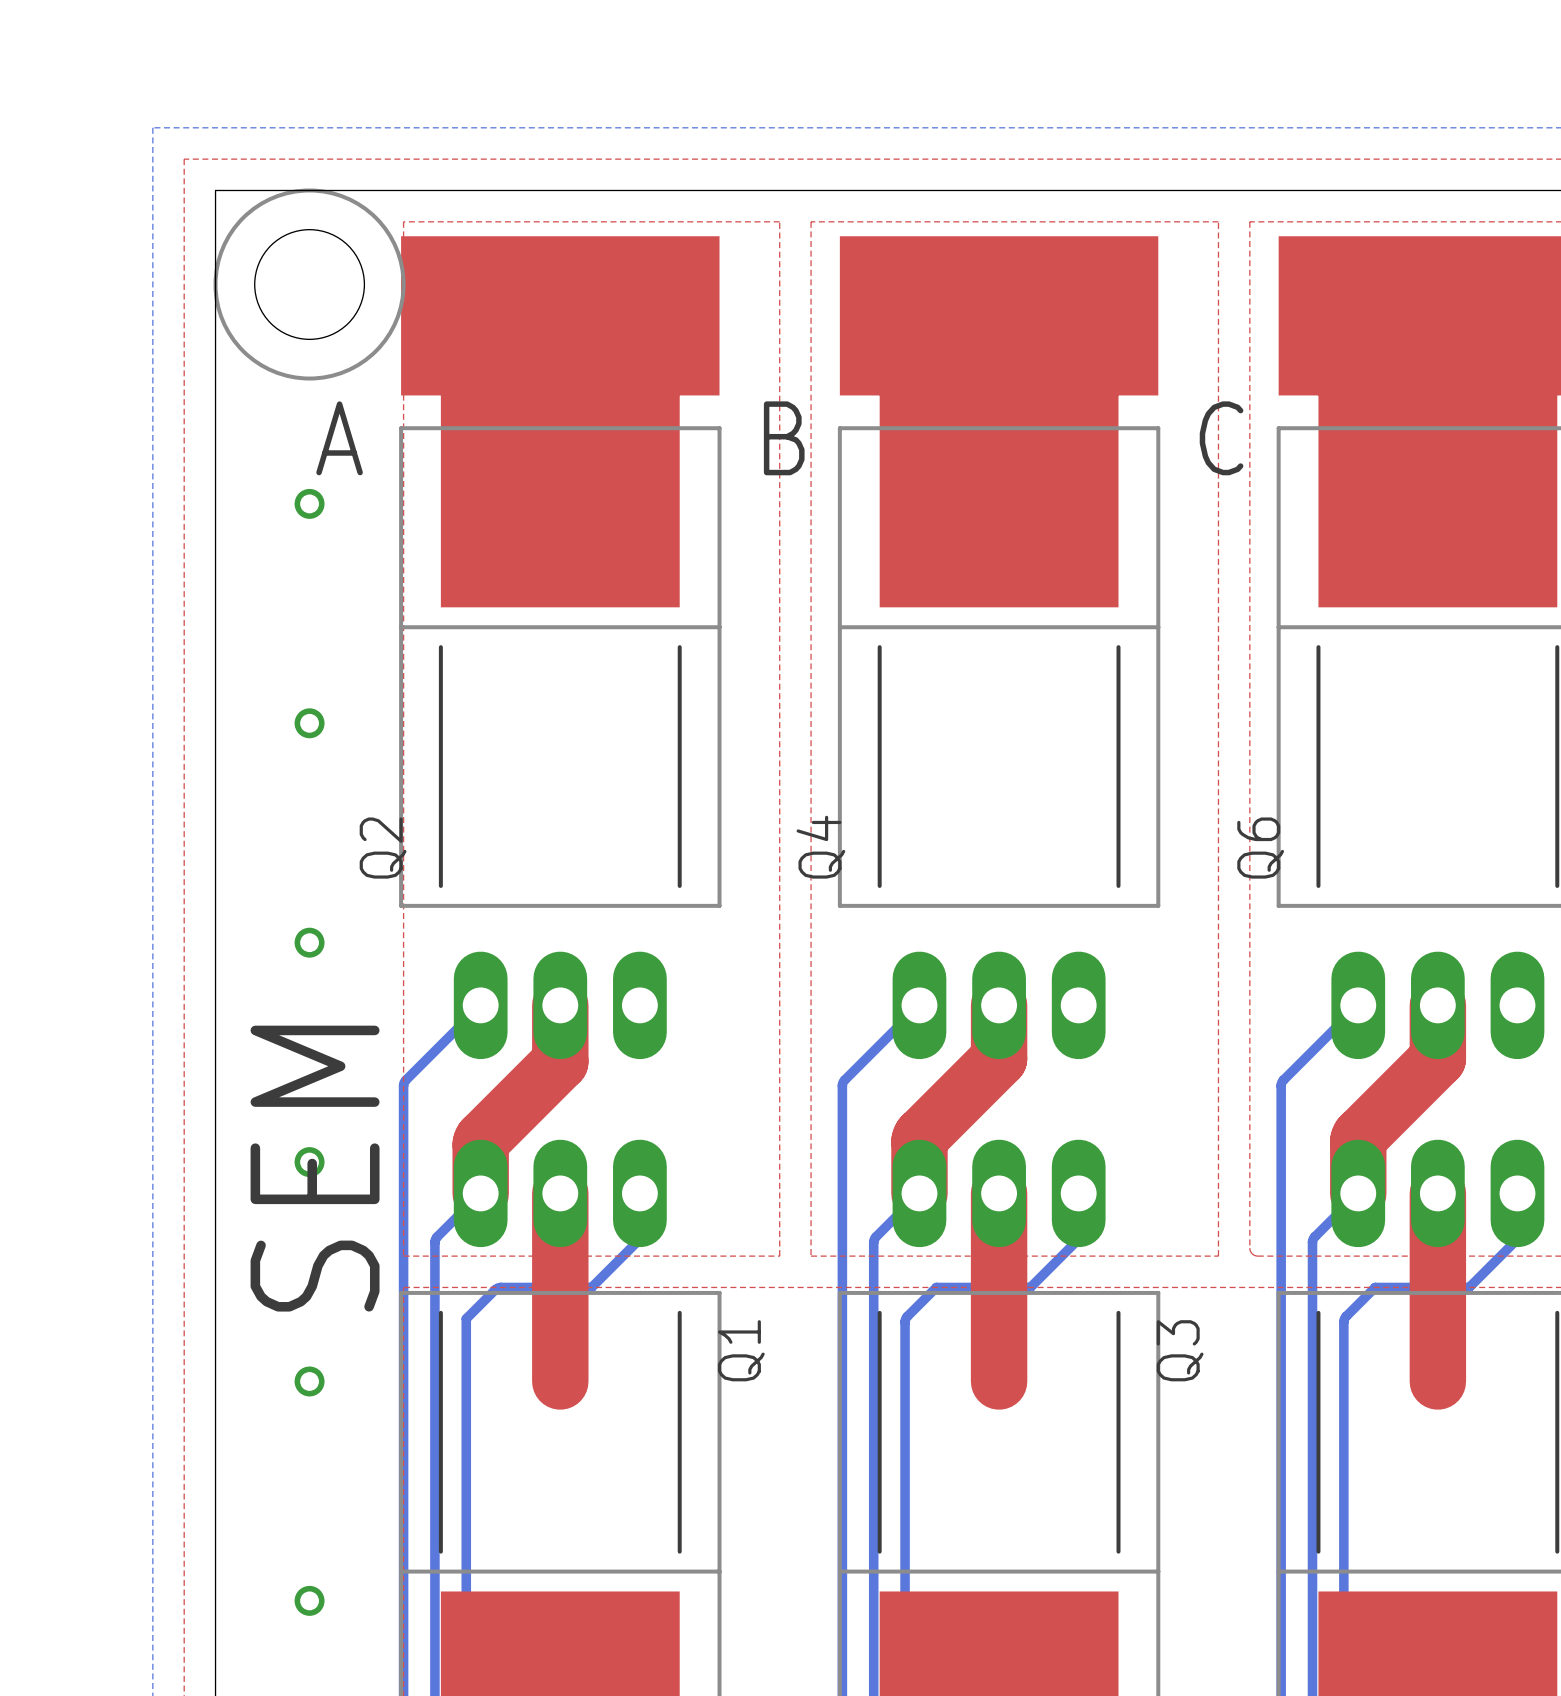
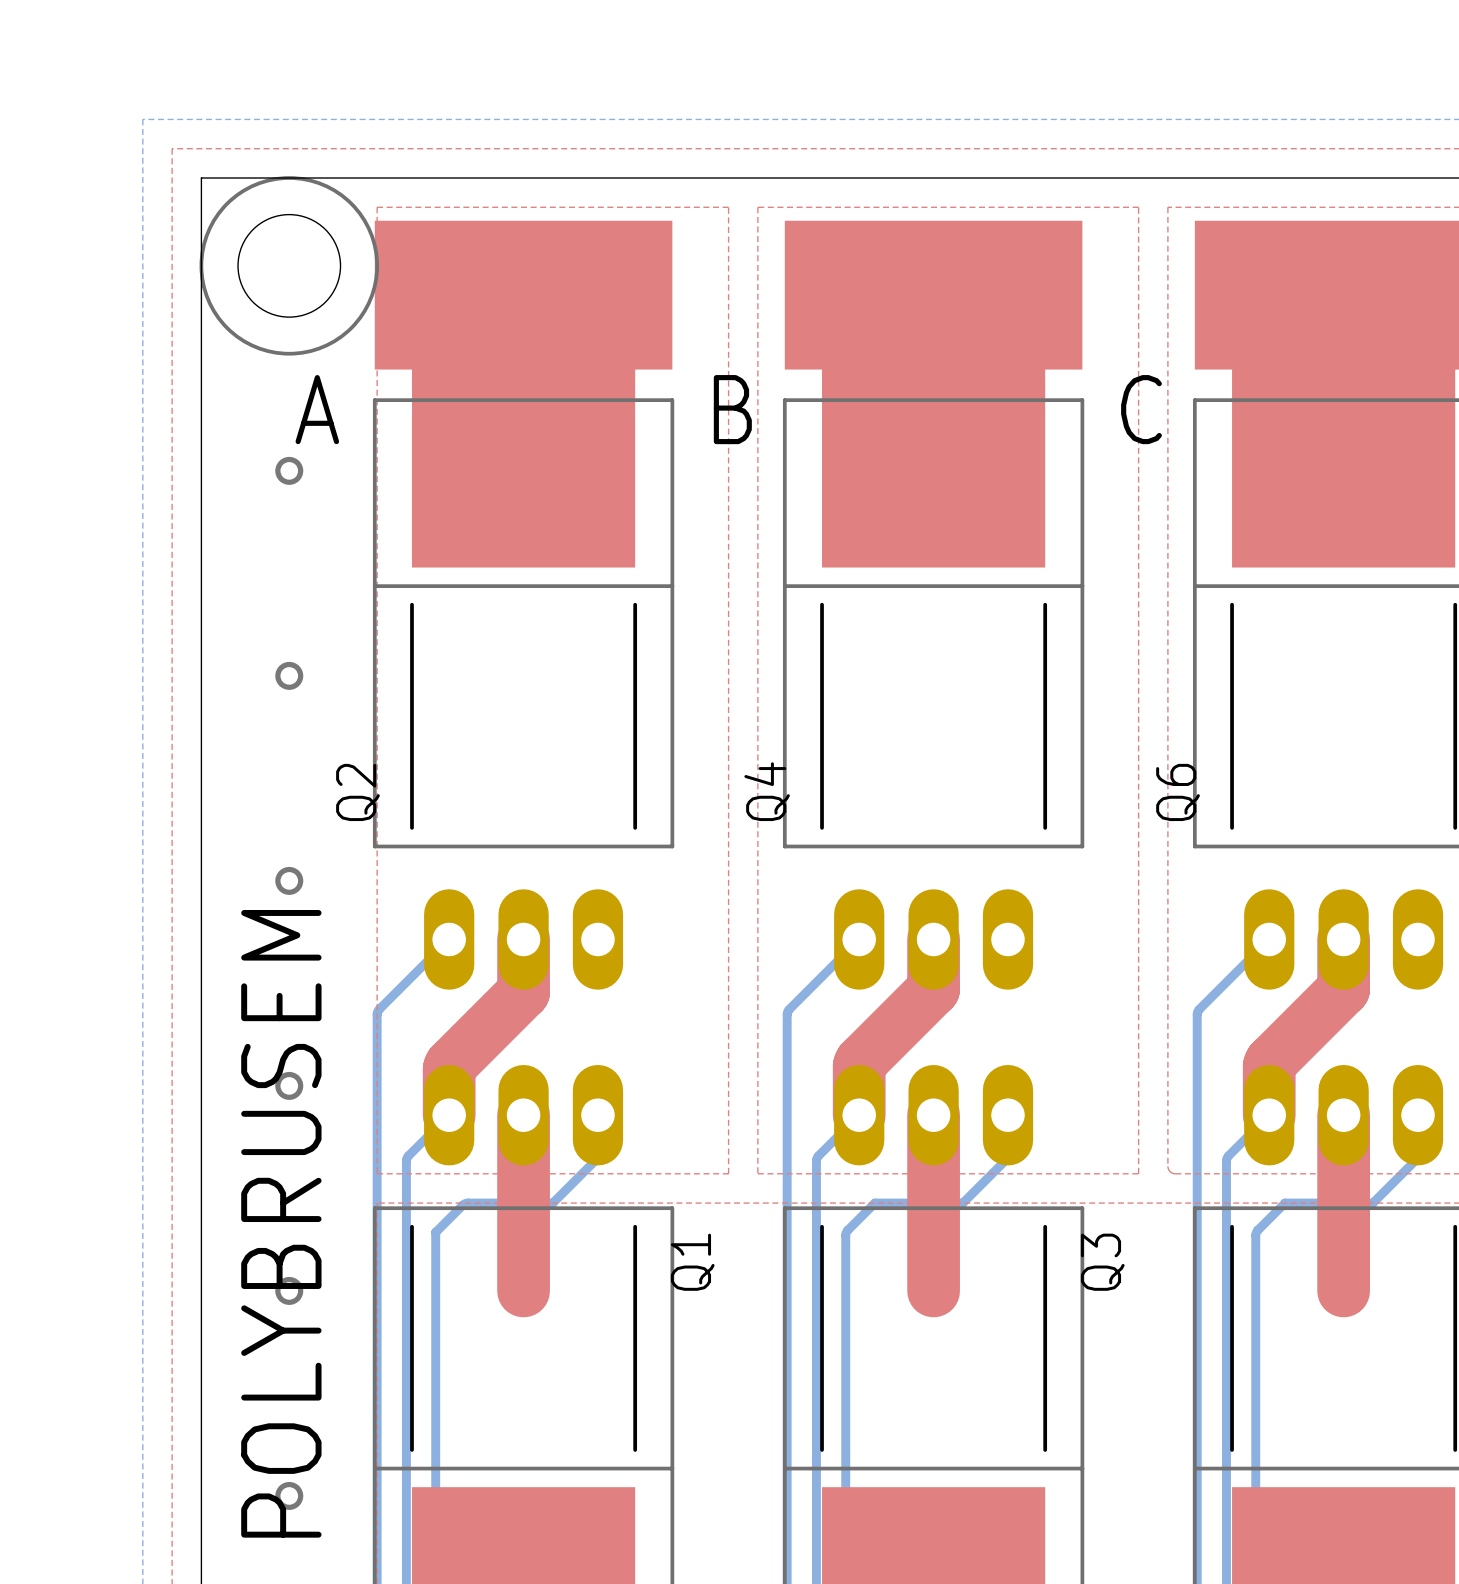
text: SEM (315, 1168) -> none
text: none -> POLYBRUSEM (281, 1223)

